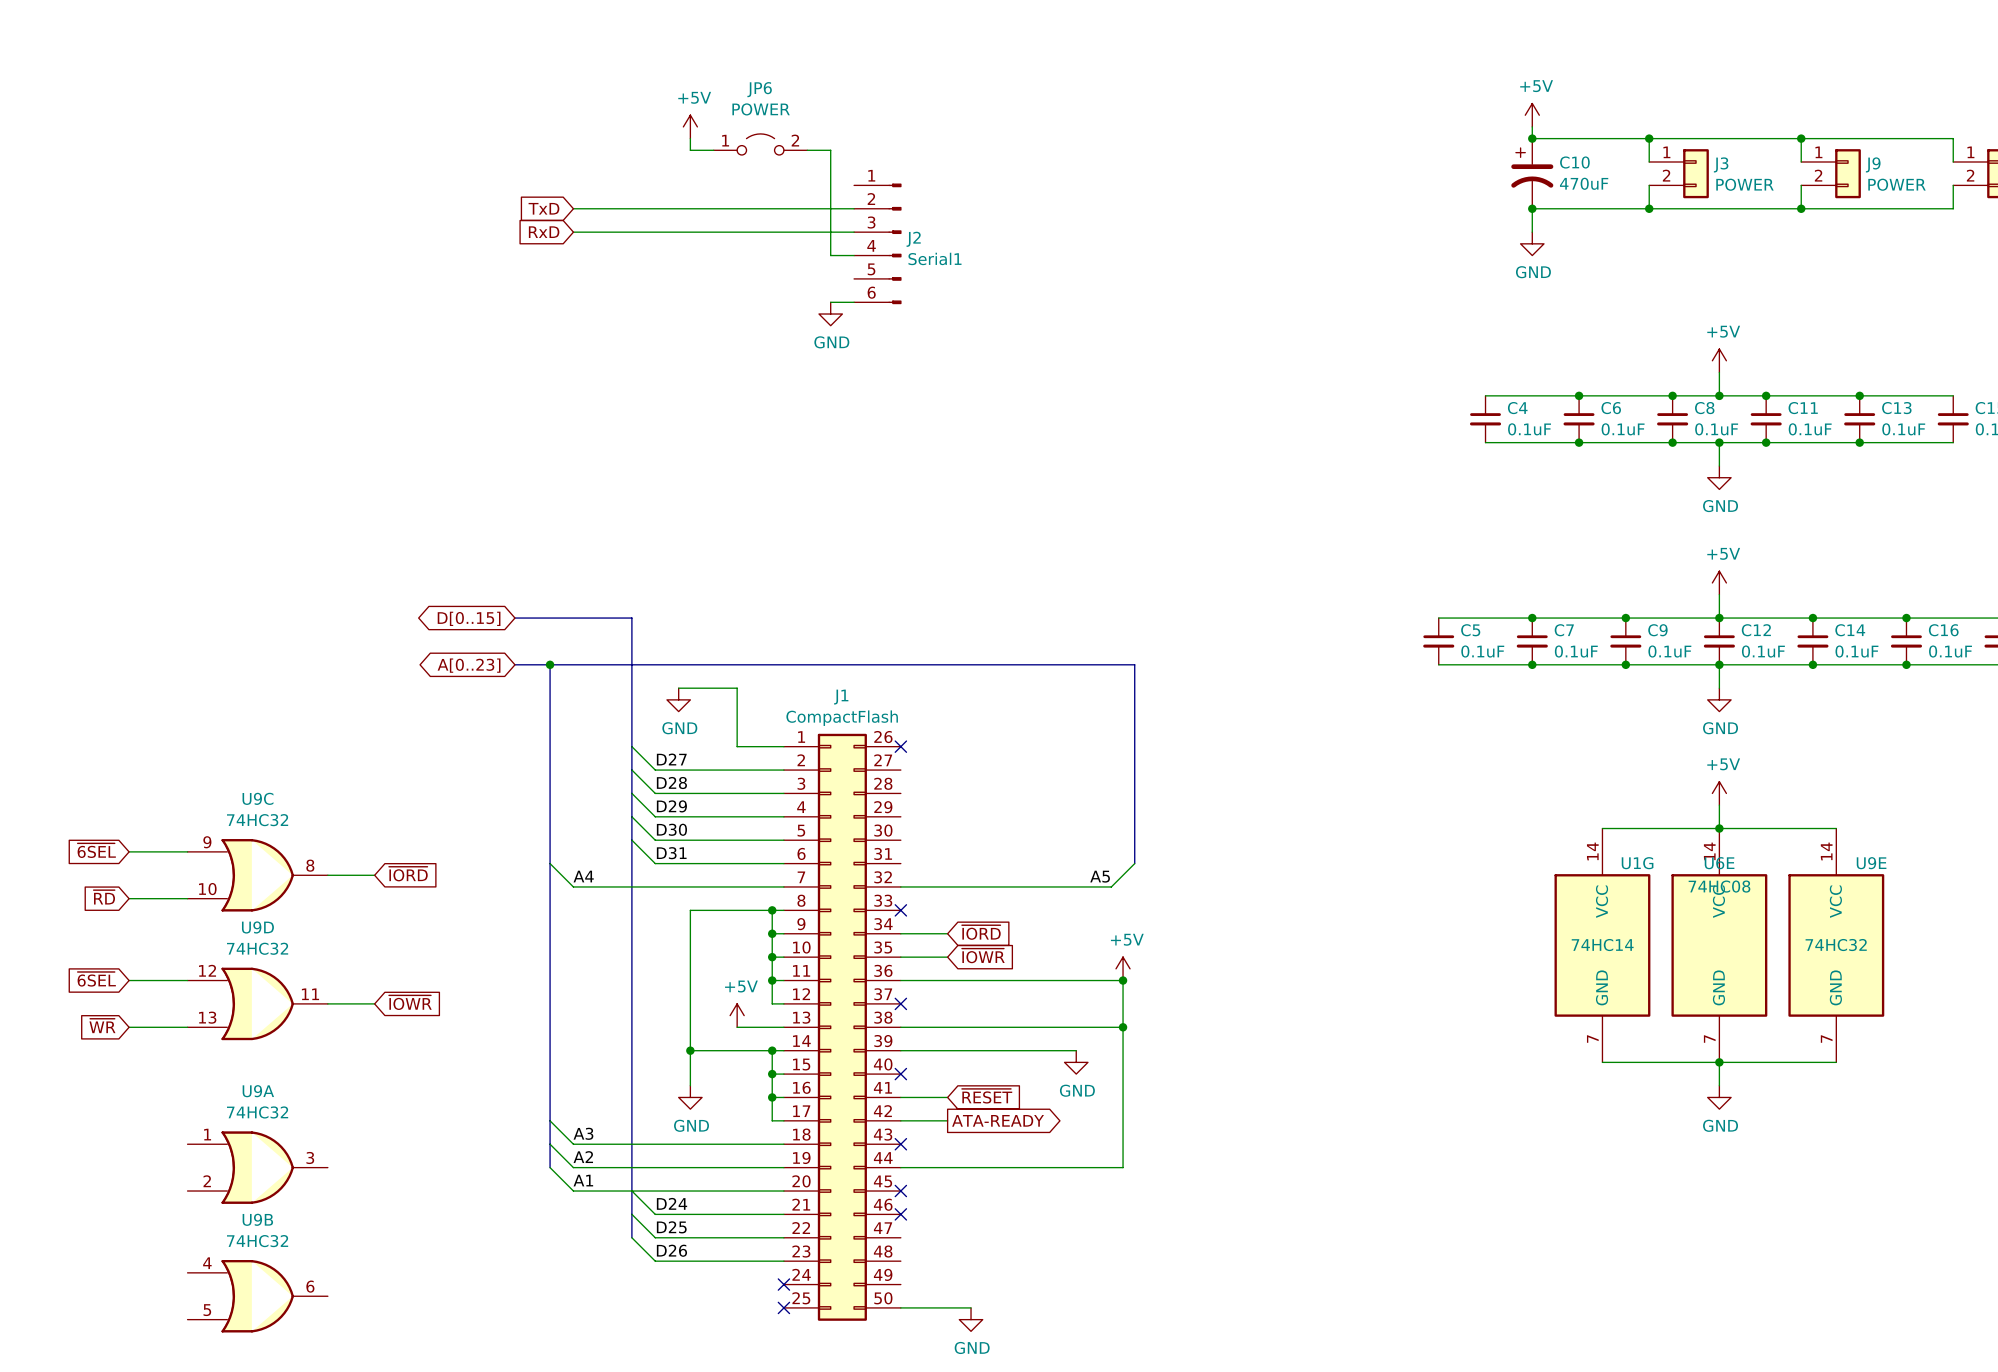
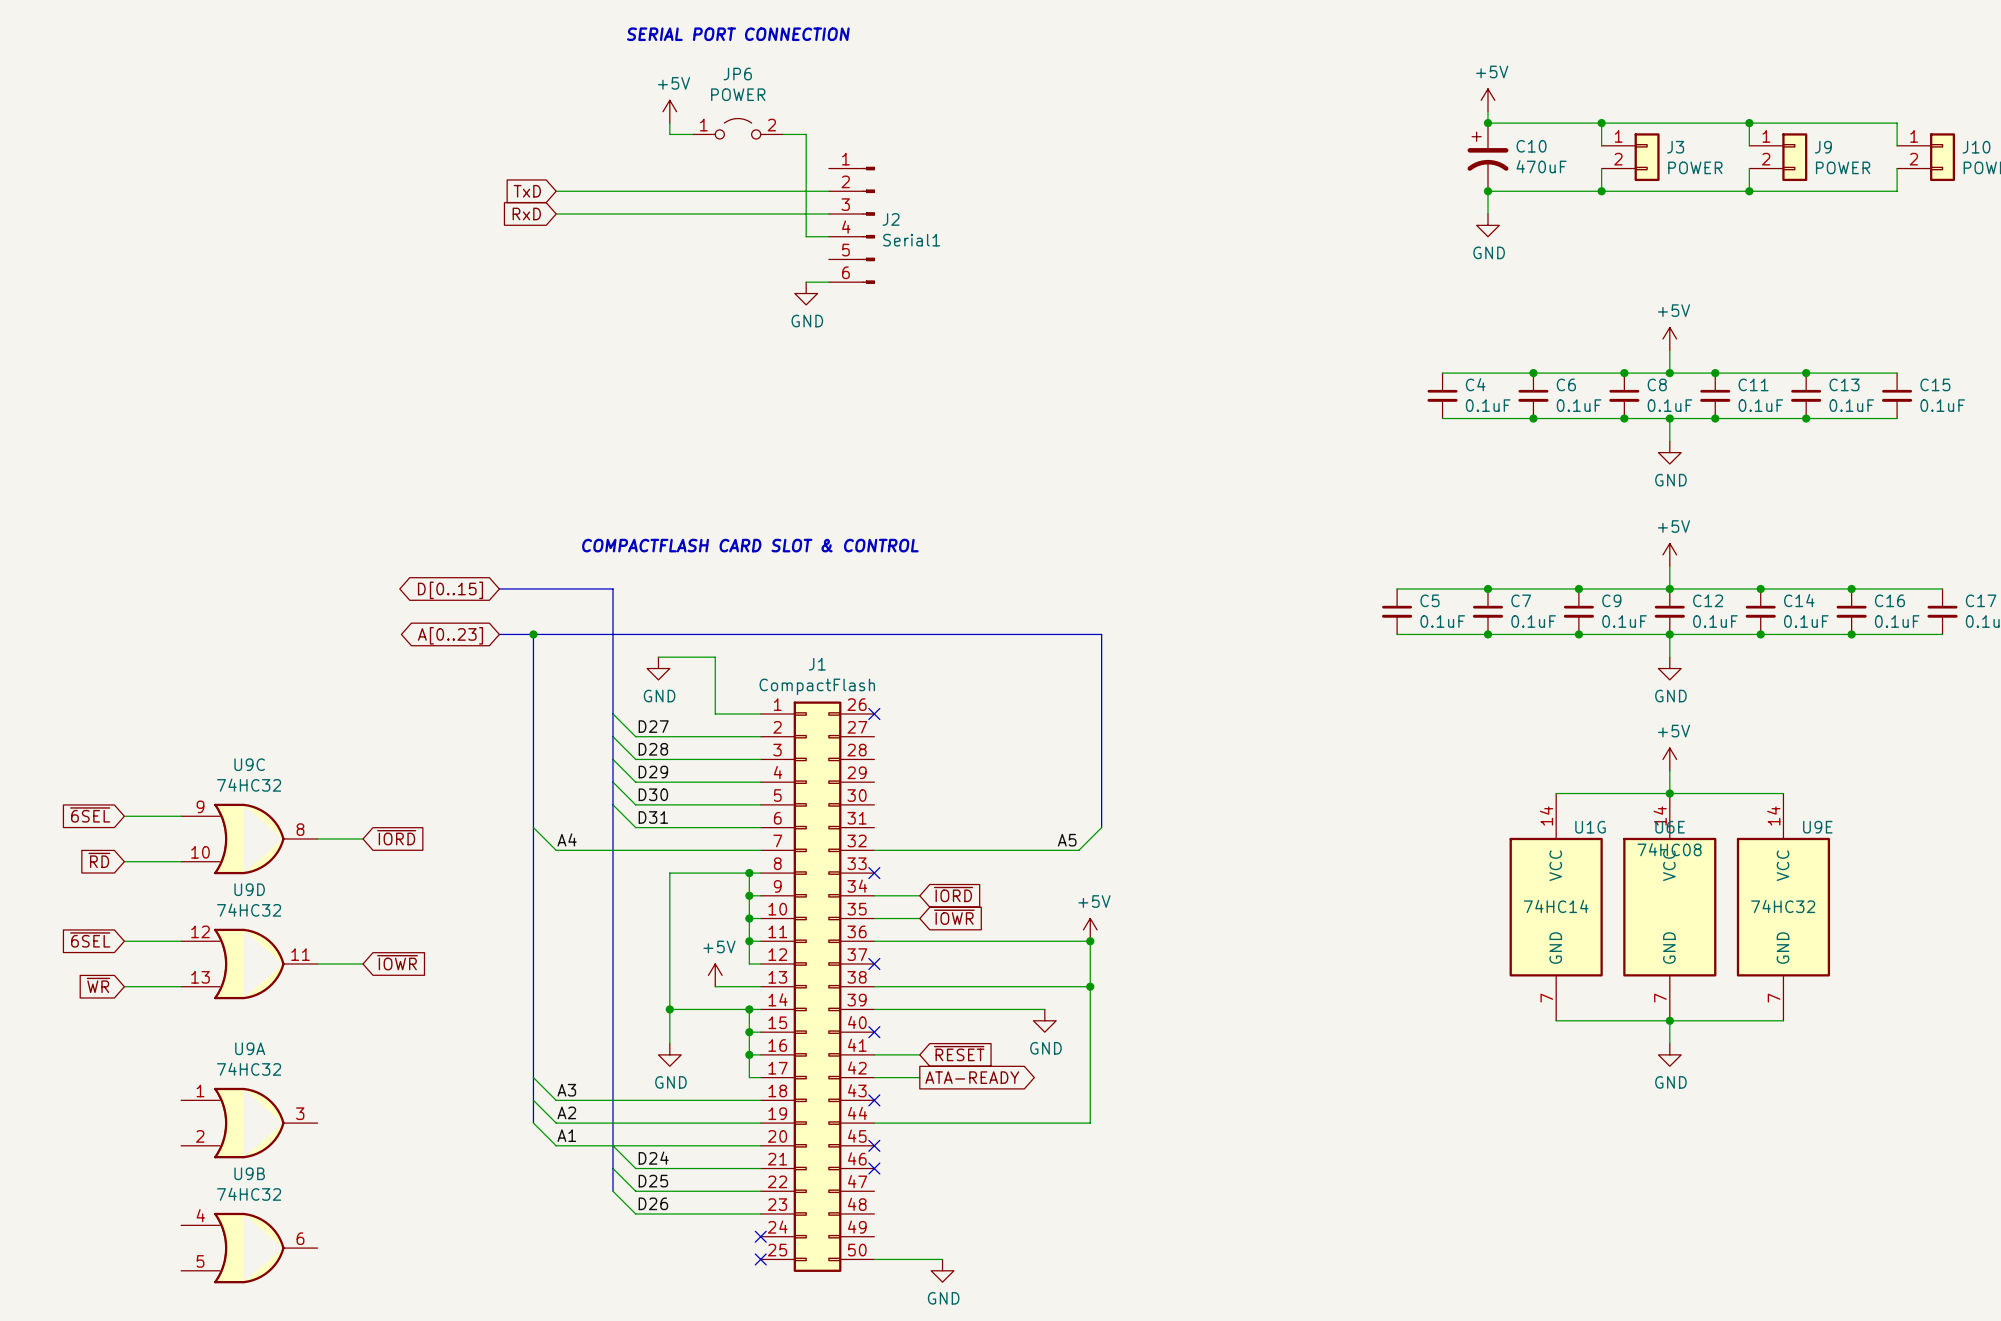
text: none -> SERIAL PORT CONNECTION (738, 34)
text: none -> COMPACTFLASH CARD SLOT & CONTROL (750, 545)

